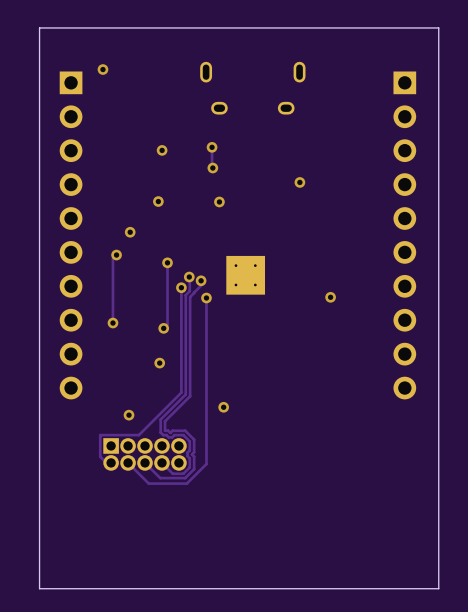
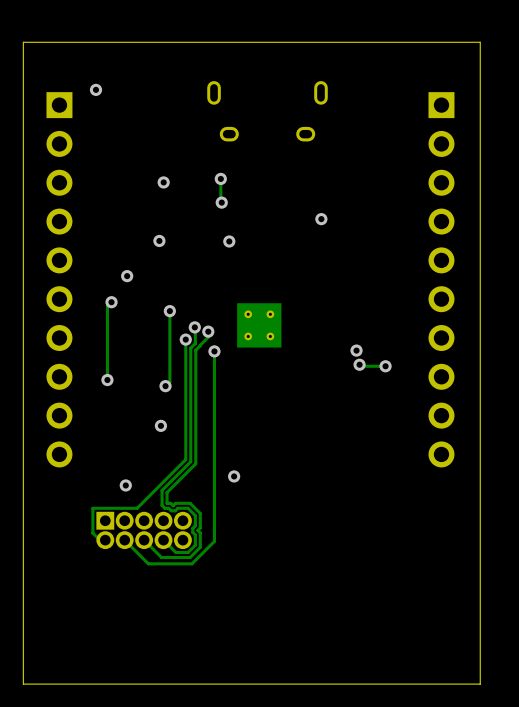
track: none -> (359, 364) (385, 366)
via: none -> (359, 364)
via: none -> (385, 366)

